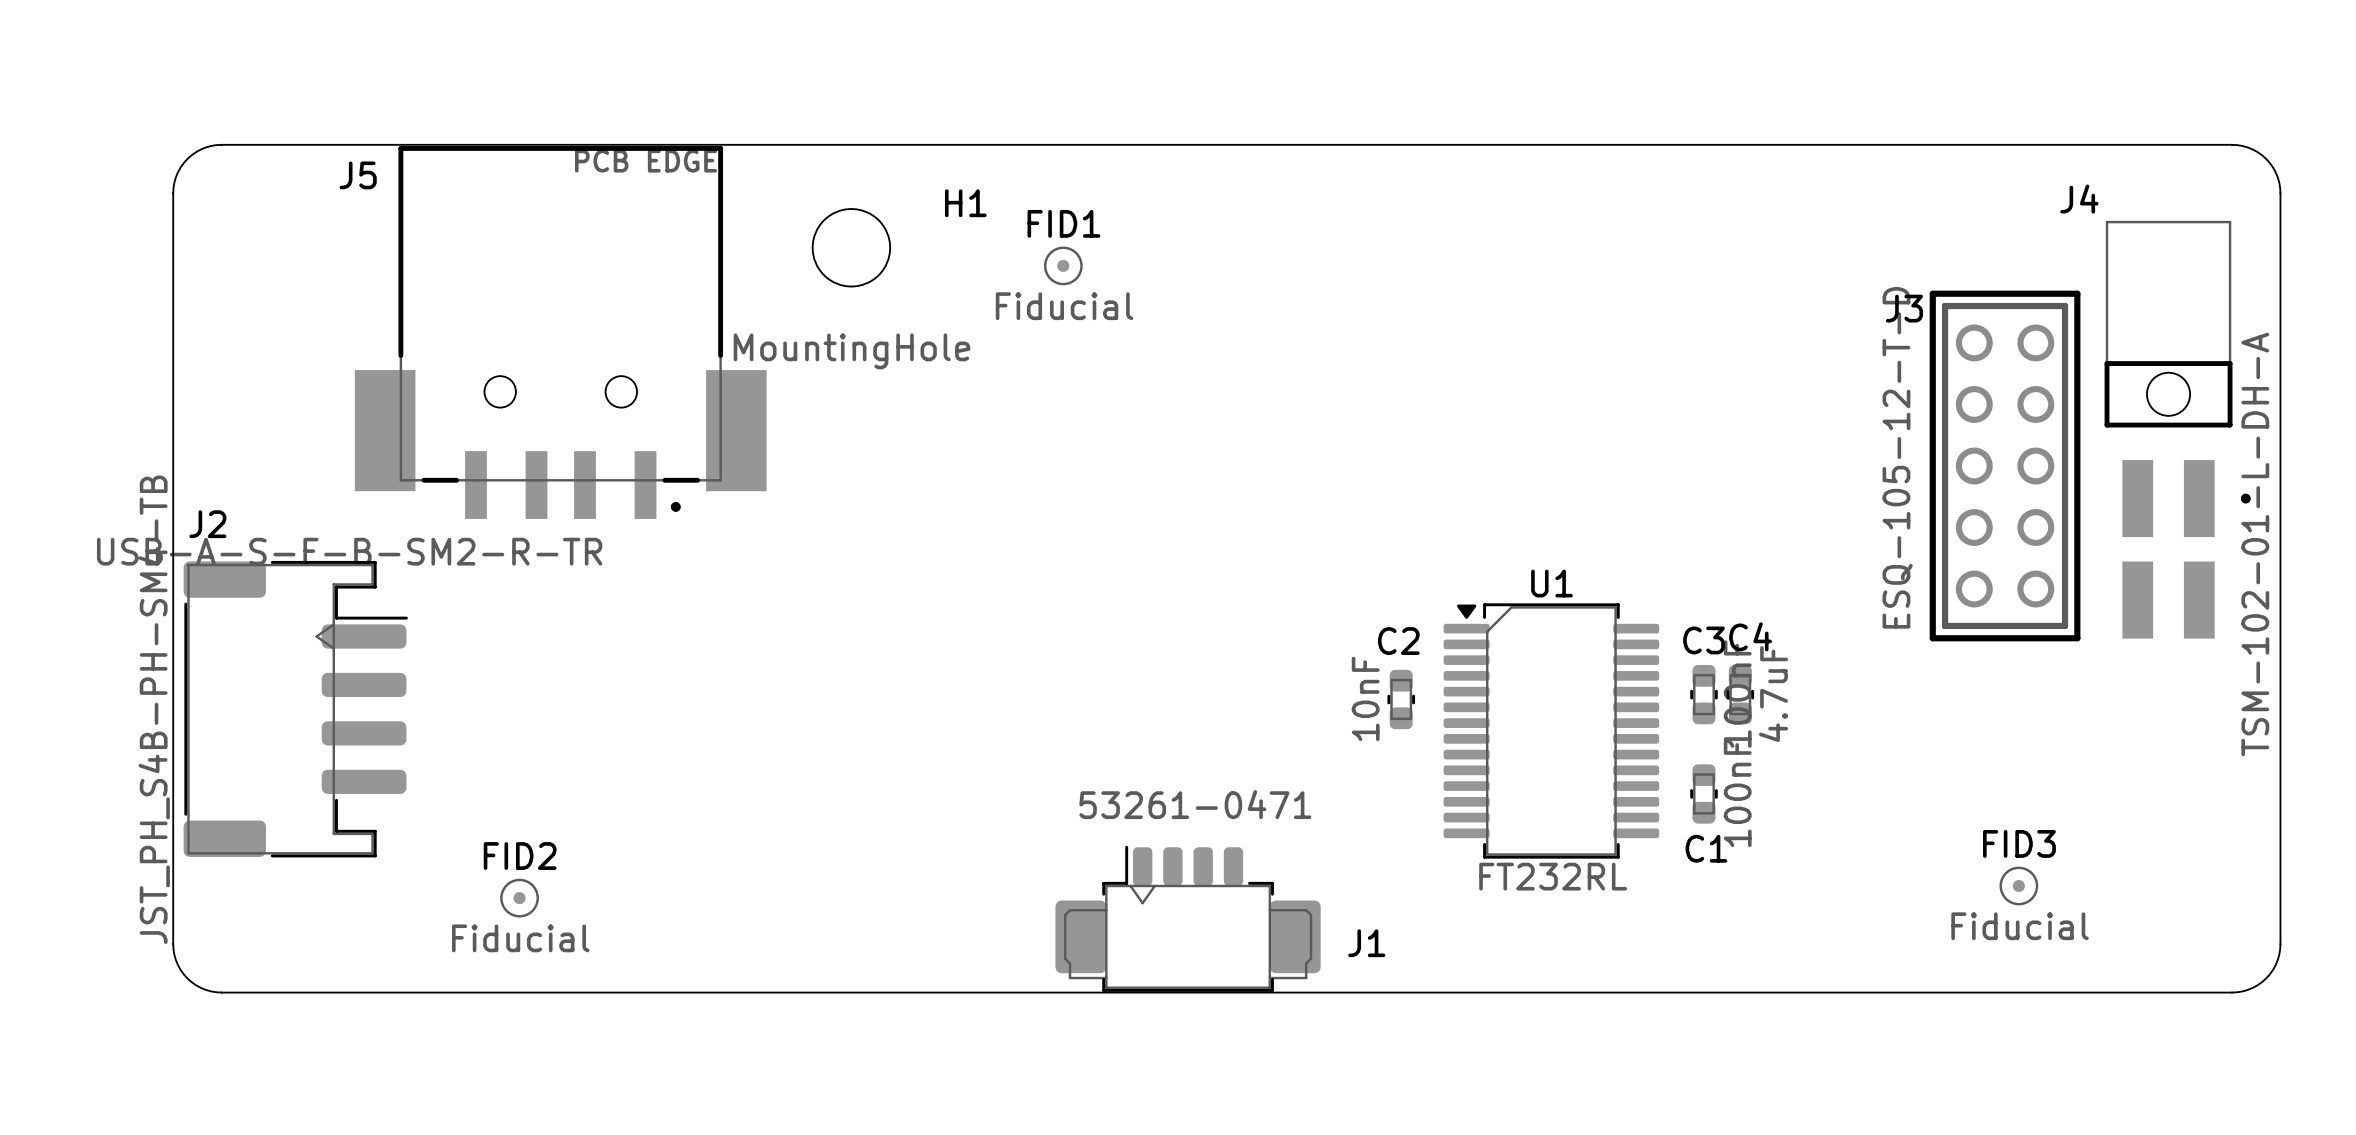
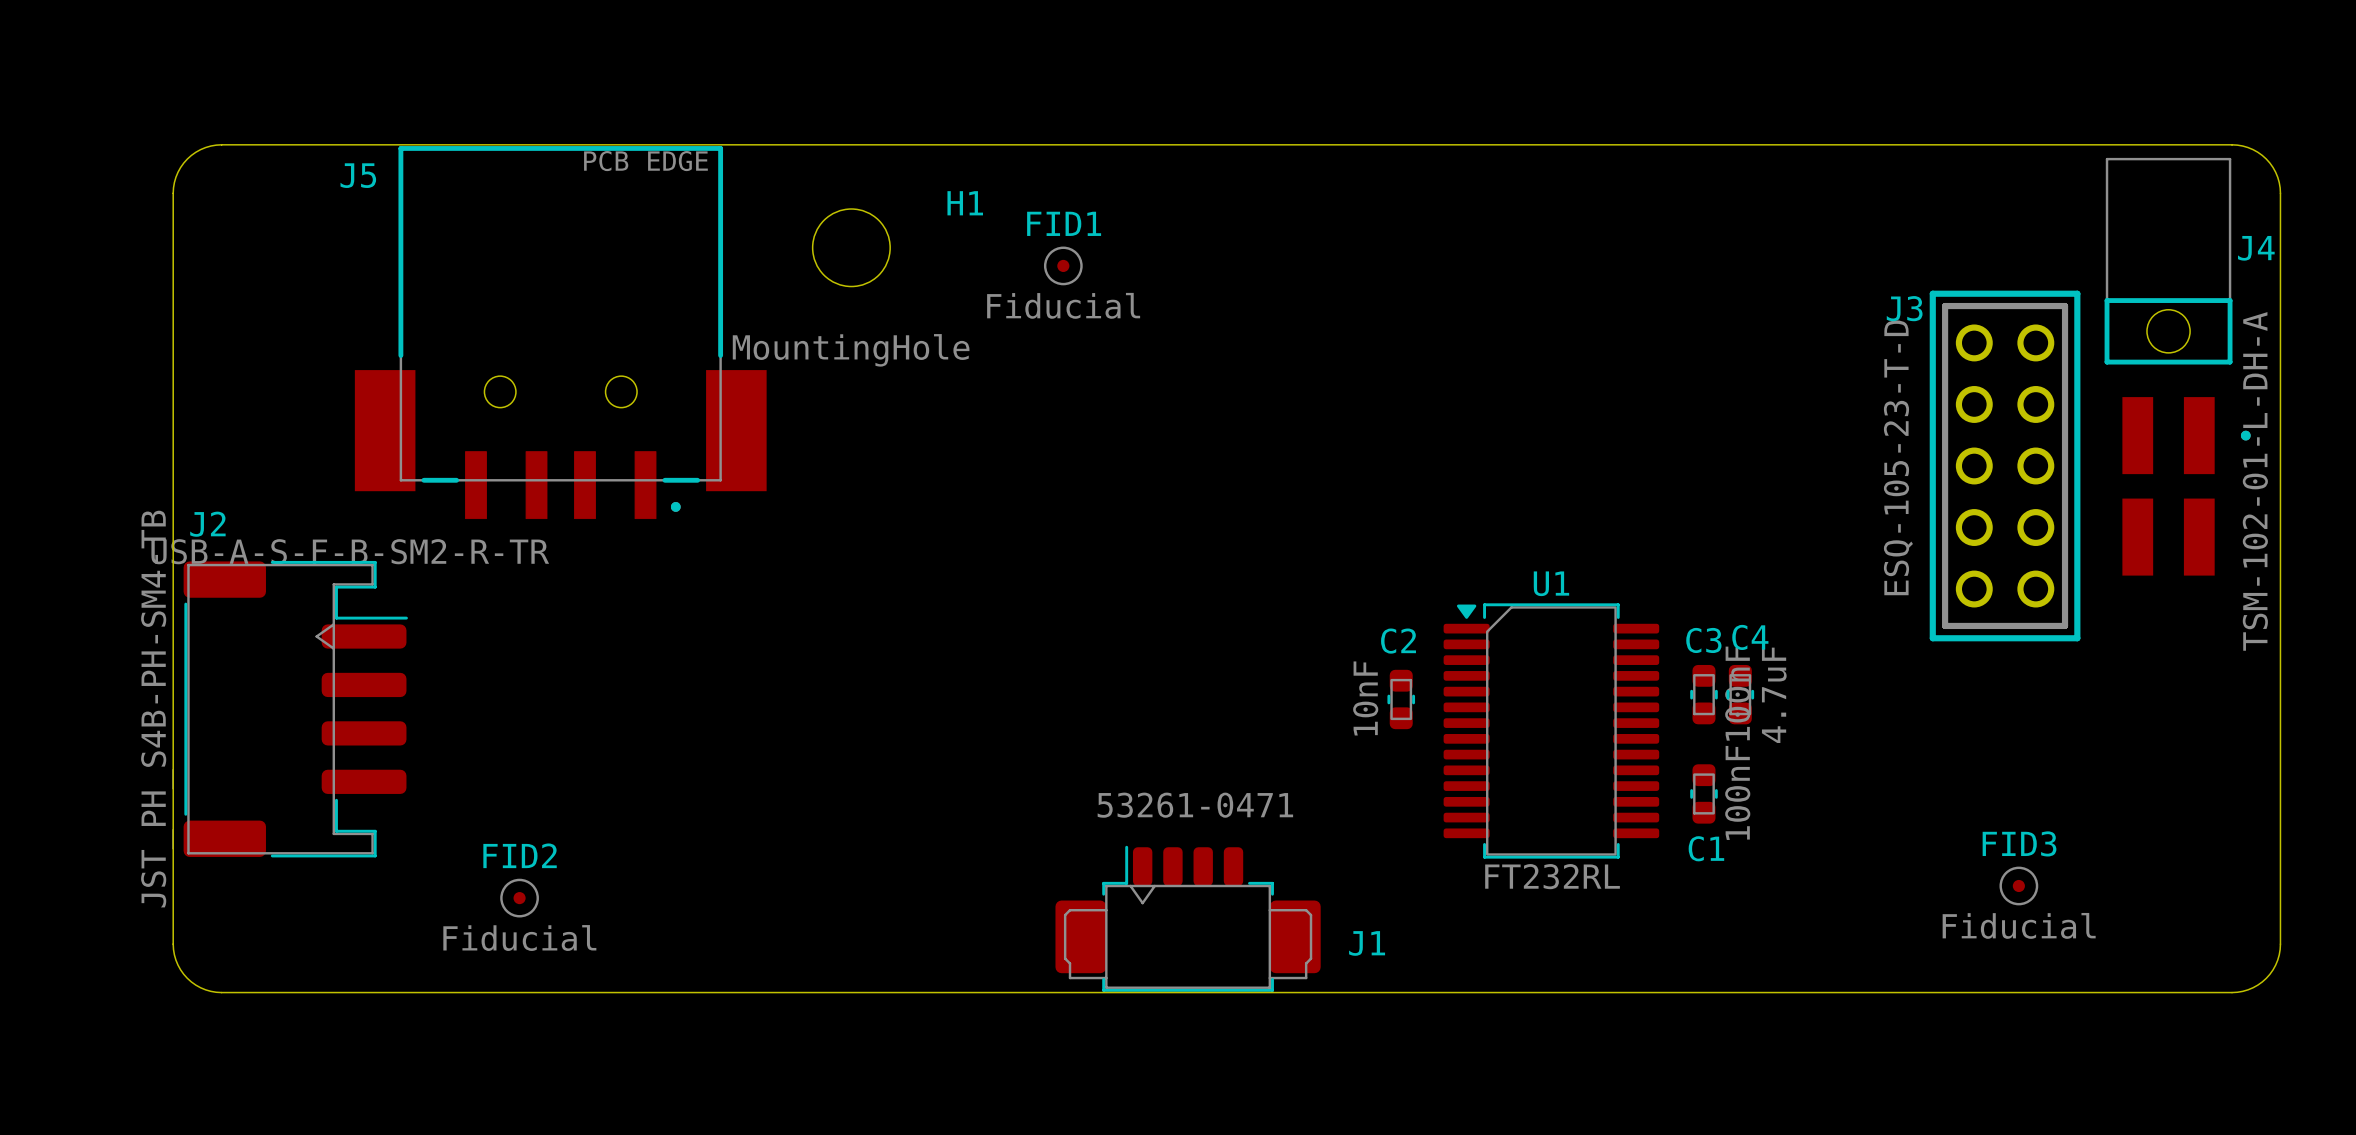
J4 name position: J4 (2079, 199) -> J4 (2256, 248)
J4 position: (2177, 429) -> (2177, 366)
J3 value: ESQ-105-12-T-D (1897, 457) -> ESQ-105-23-T-D (1898, 457)

